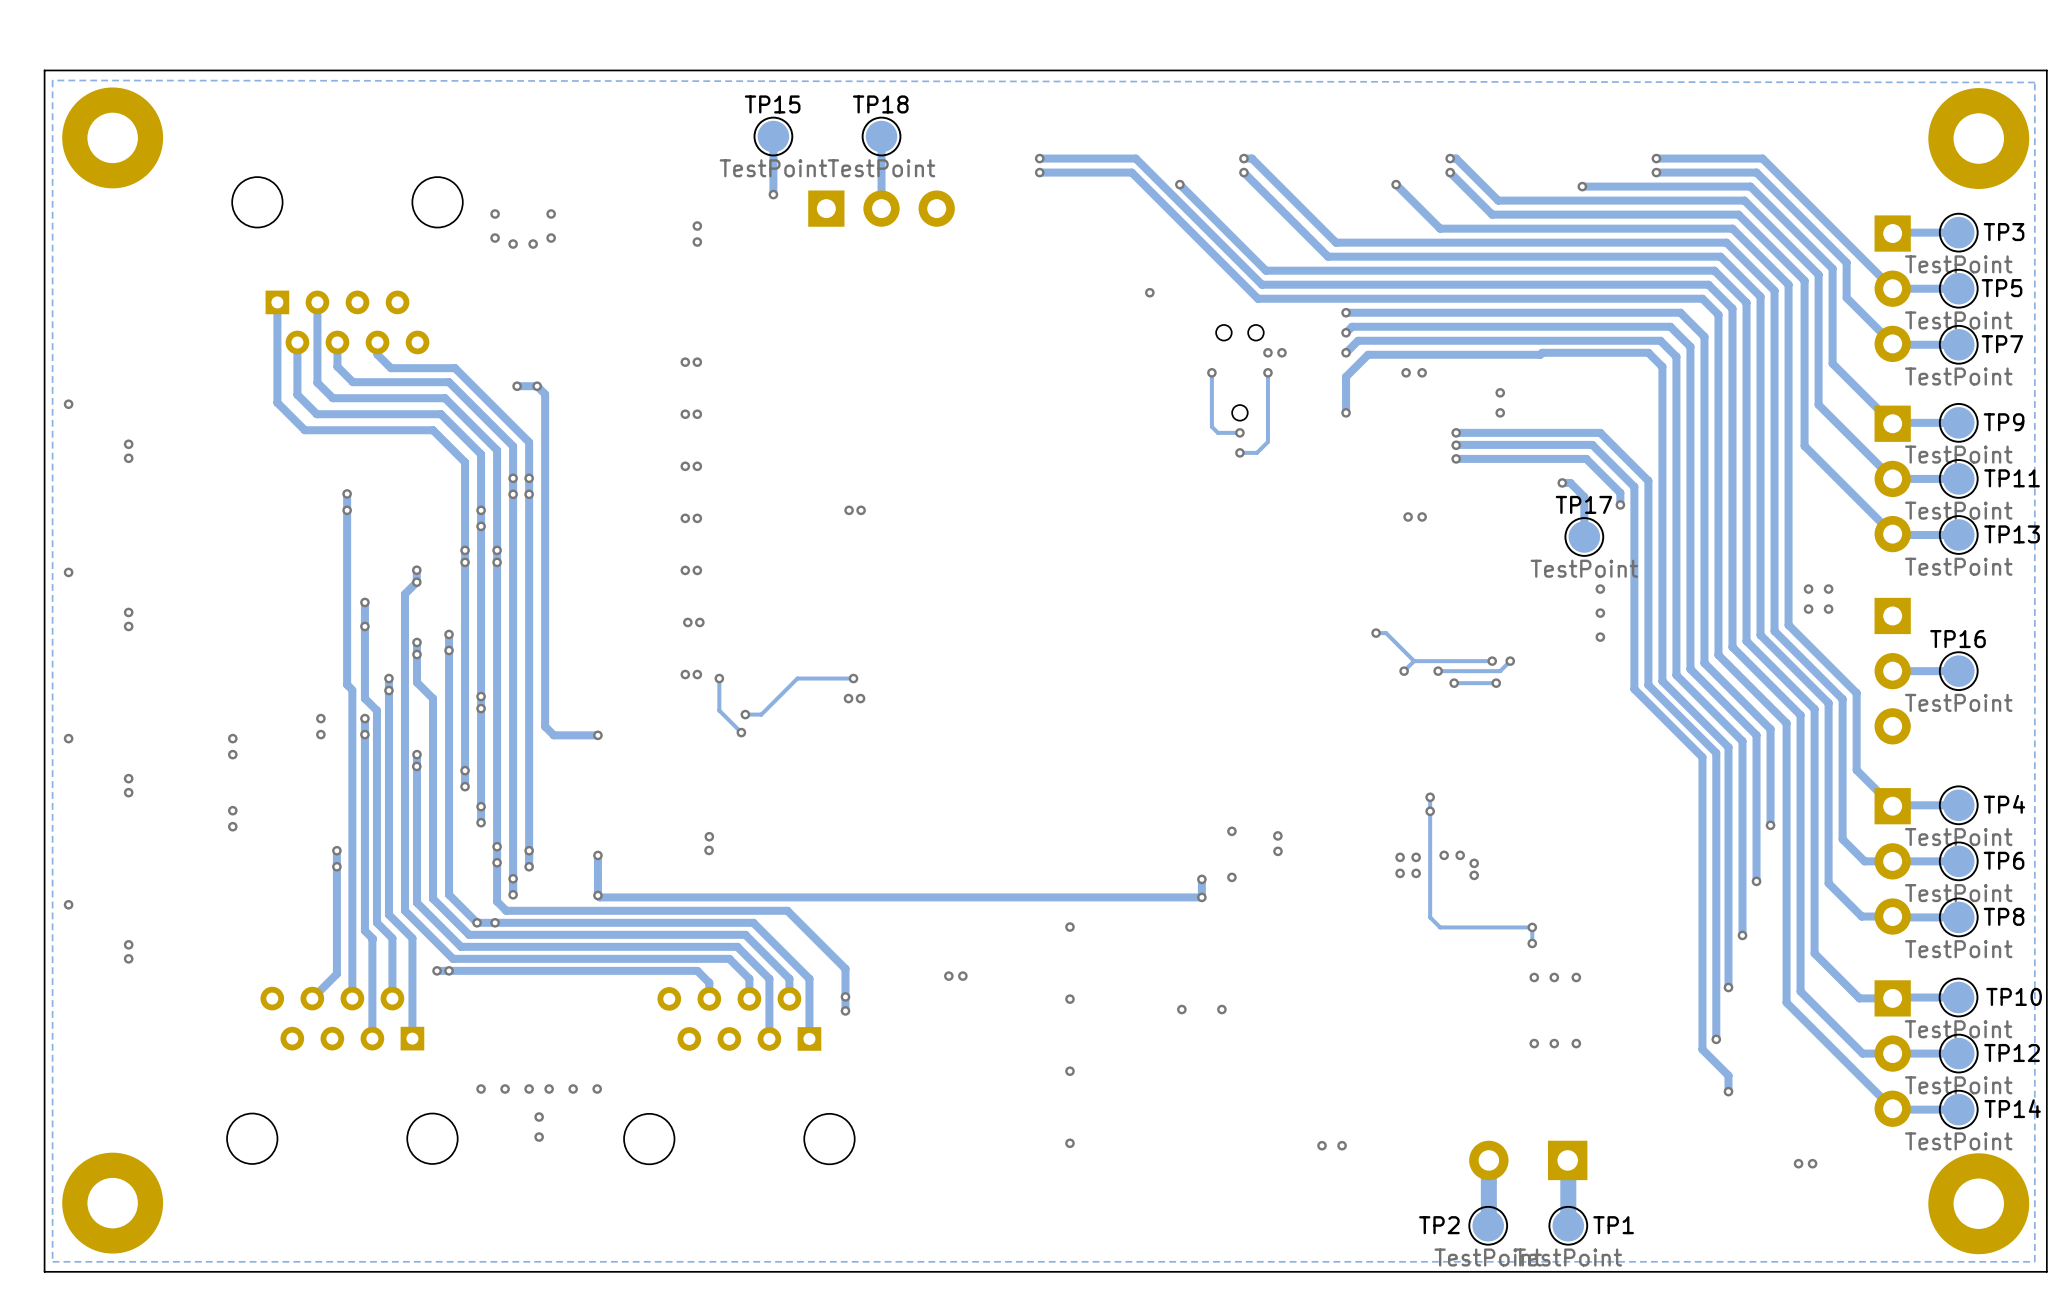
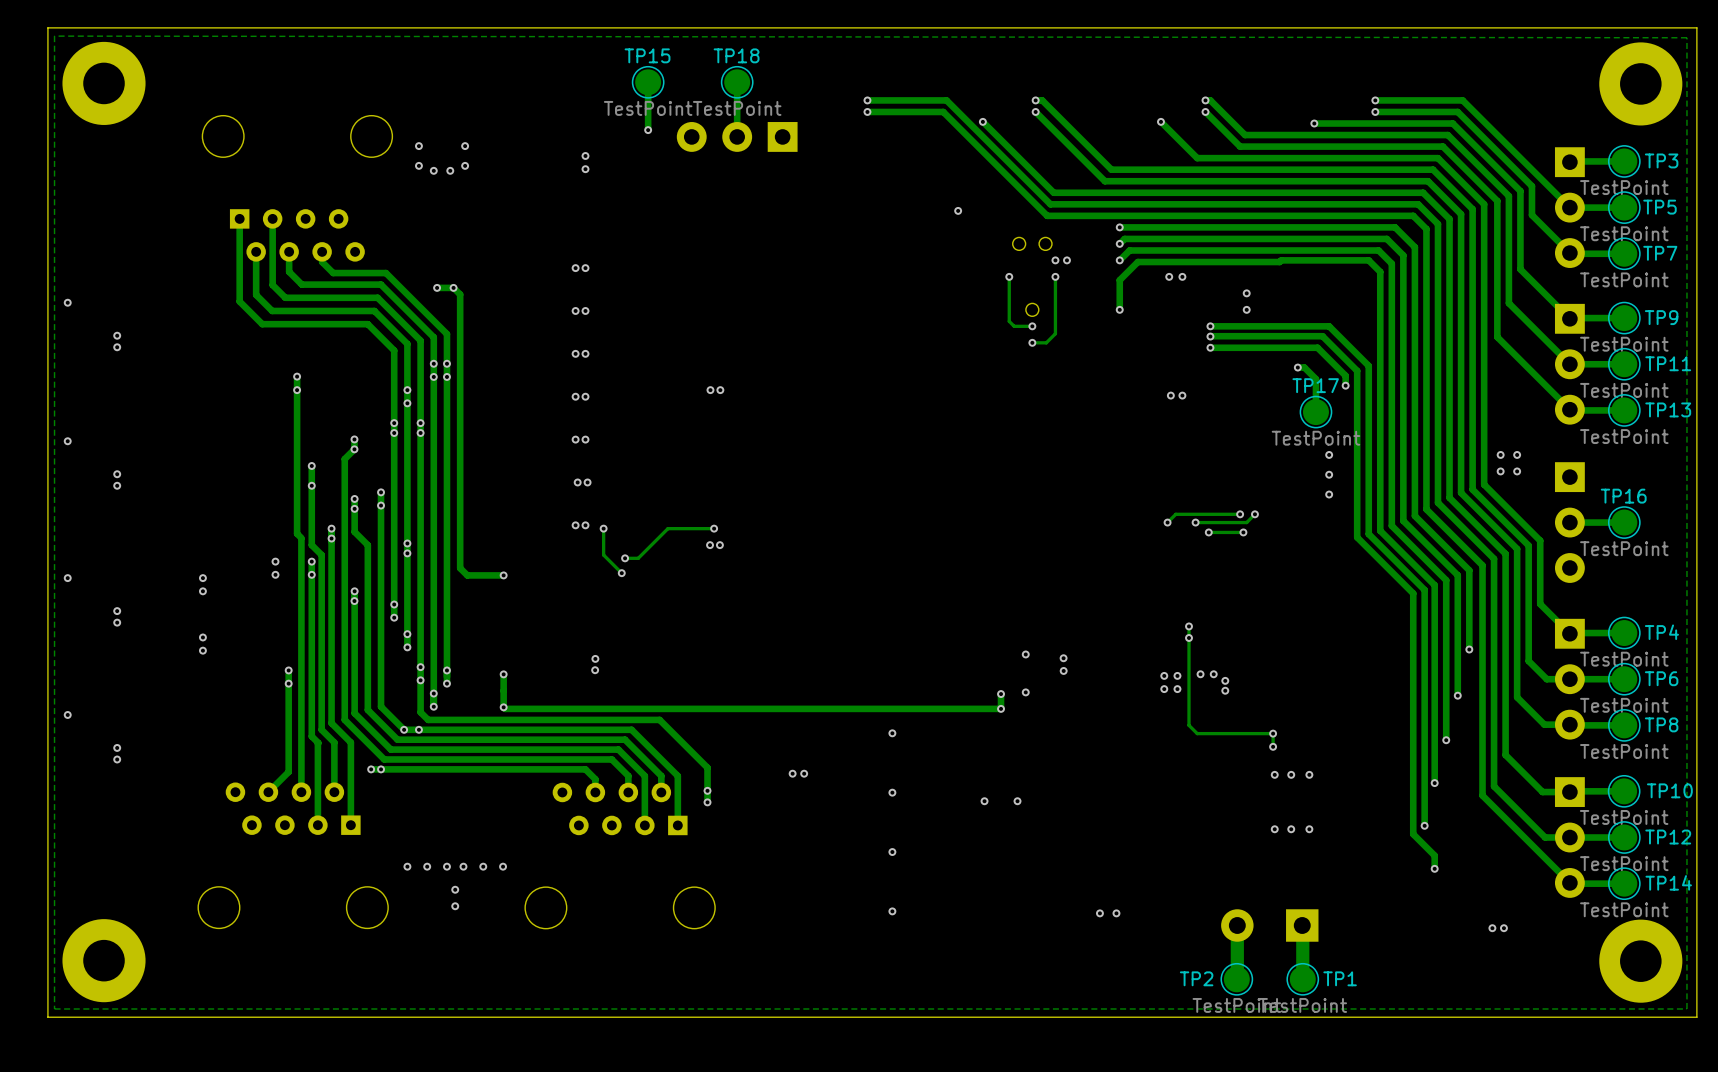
part rotation: 0° (881, 208) -> 180° (737, 136)
track: (1376, 633) (1386, 633) (1414, 661) -> none
via: (1376, 633) -> none

